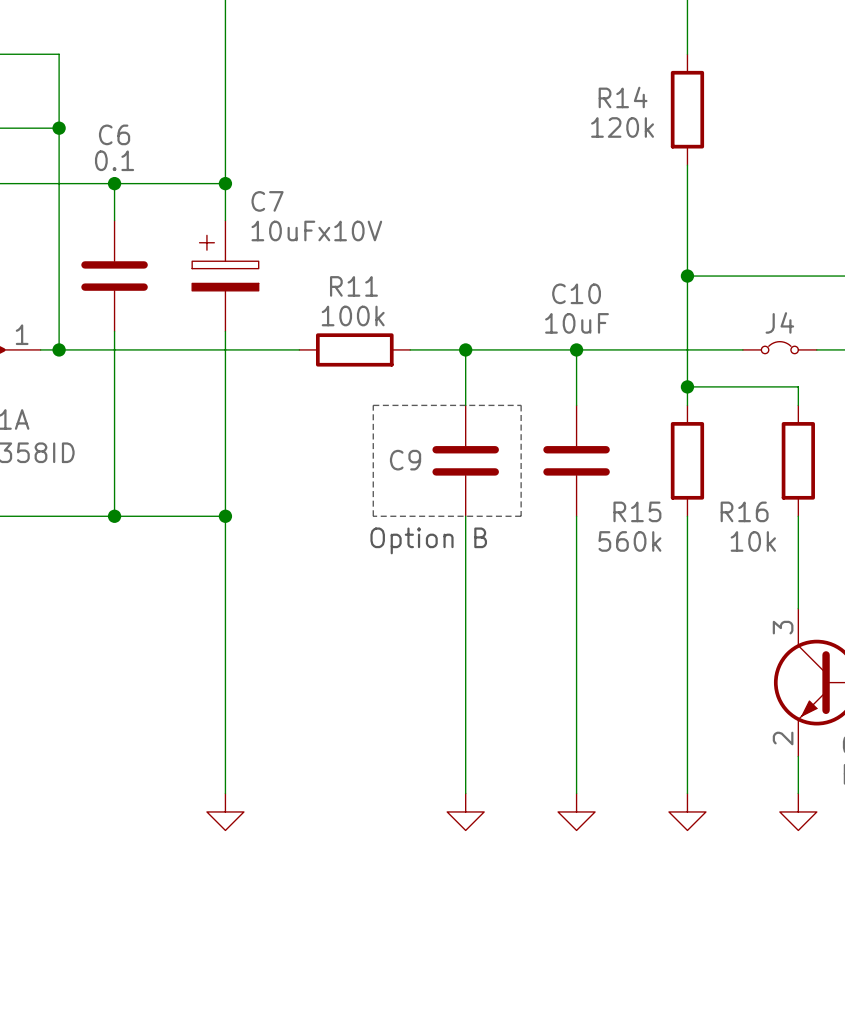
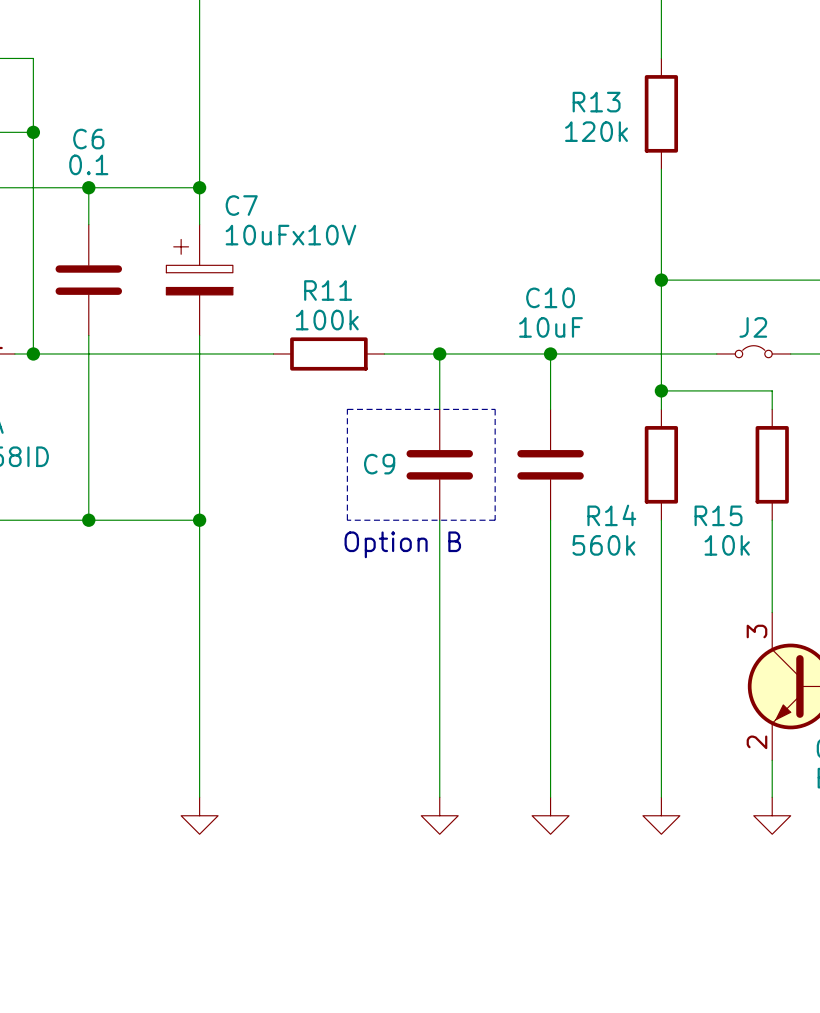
R14 name: R14 (623, 97) -> R13 (596, 102)
J4 name: J4 (779, 322) -> J2 (753, 327)
R15 name: R15 (637, 511) -> R14 (611, 515)
R16 name: R16 (744, 511) -> R15 (718, 515)

